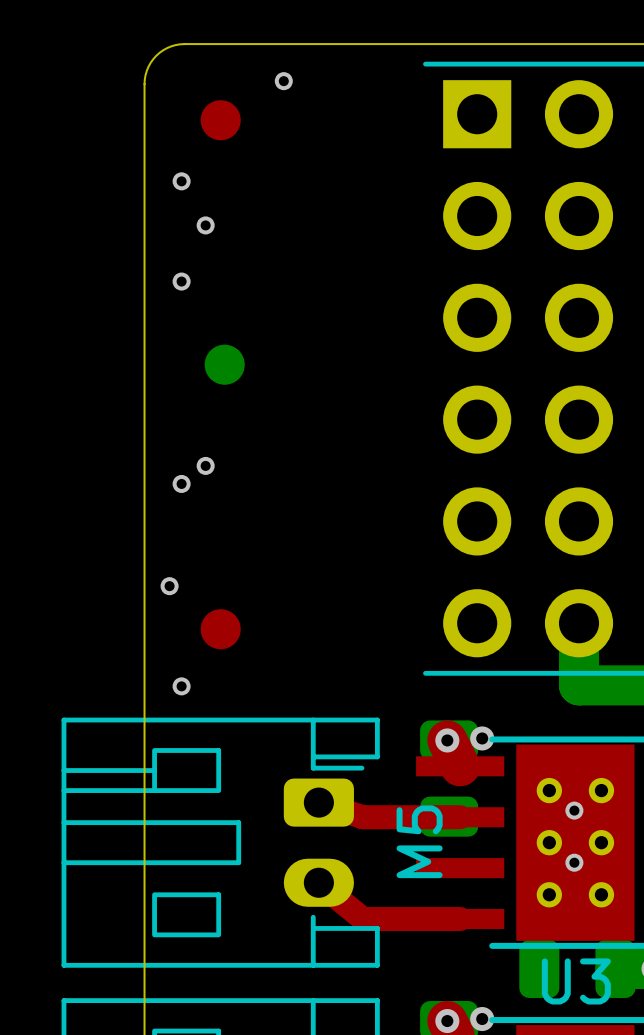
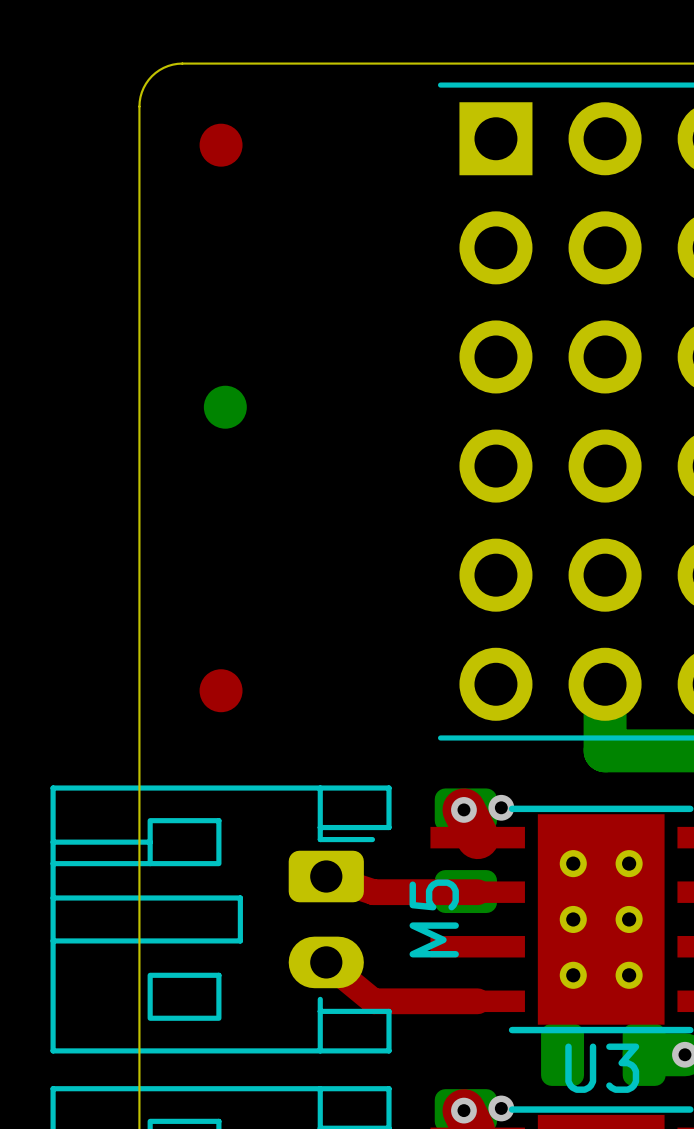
via: (283, 81) -> none
via: (181, 181) -> none
via: (205, 225) -> none
via: (181, 281) -> none
via: (205, 465) -> none
via: (181, 483) -> none
via: (169, 586) -> none
via: (181, 686) -> none
via: (574, 810) -> none
via: (574, 862) -> none

